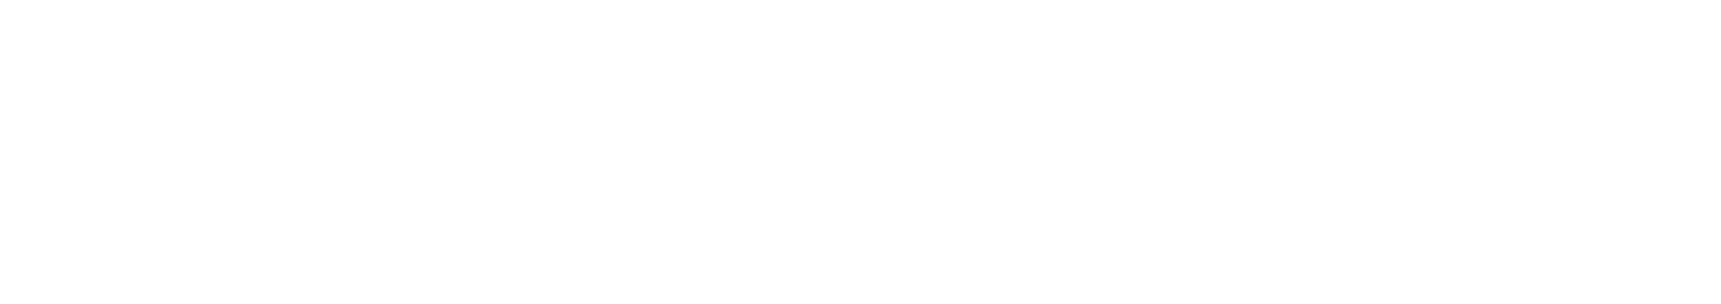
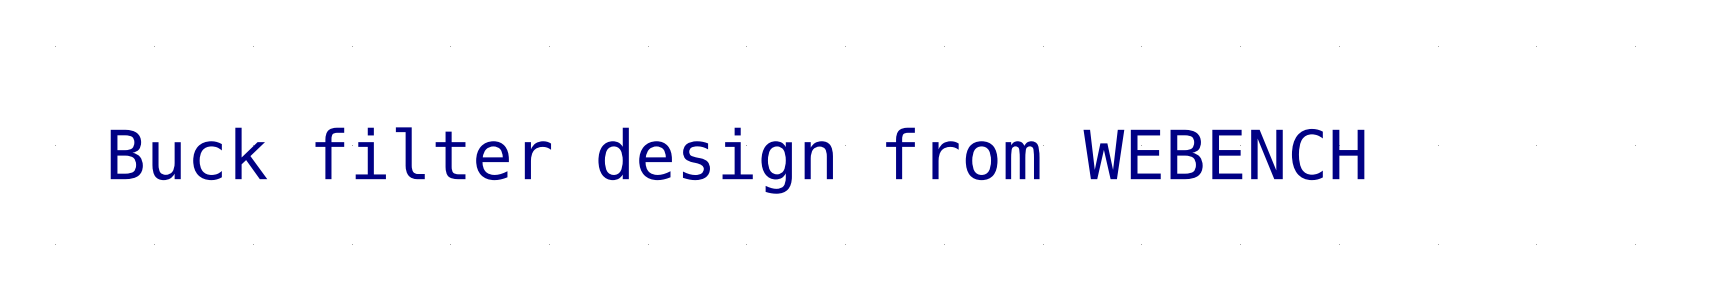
text: none -> Buck filter design from WEBENCH (737, 160)

